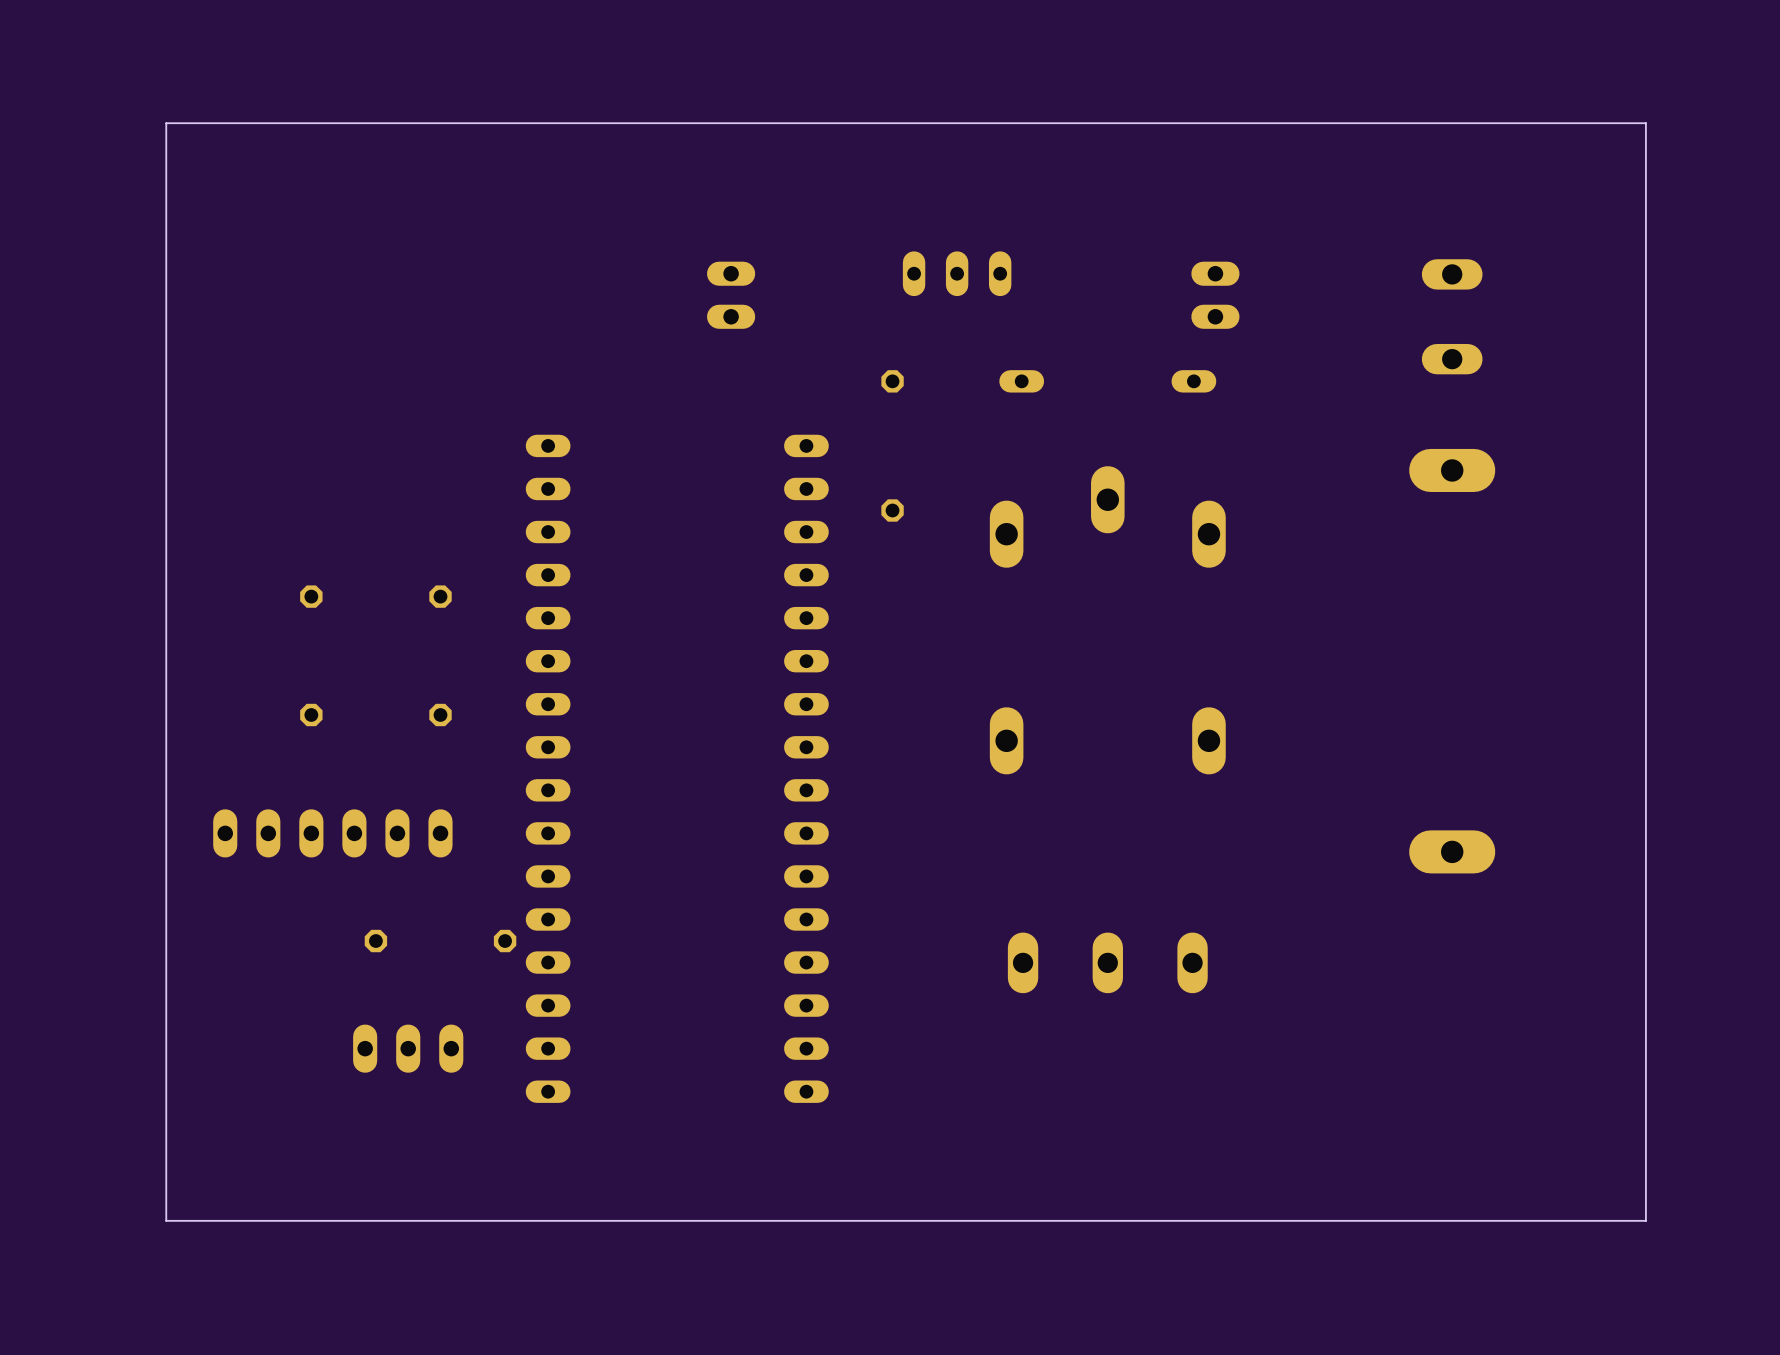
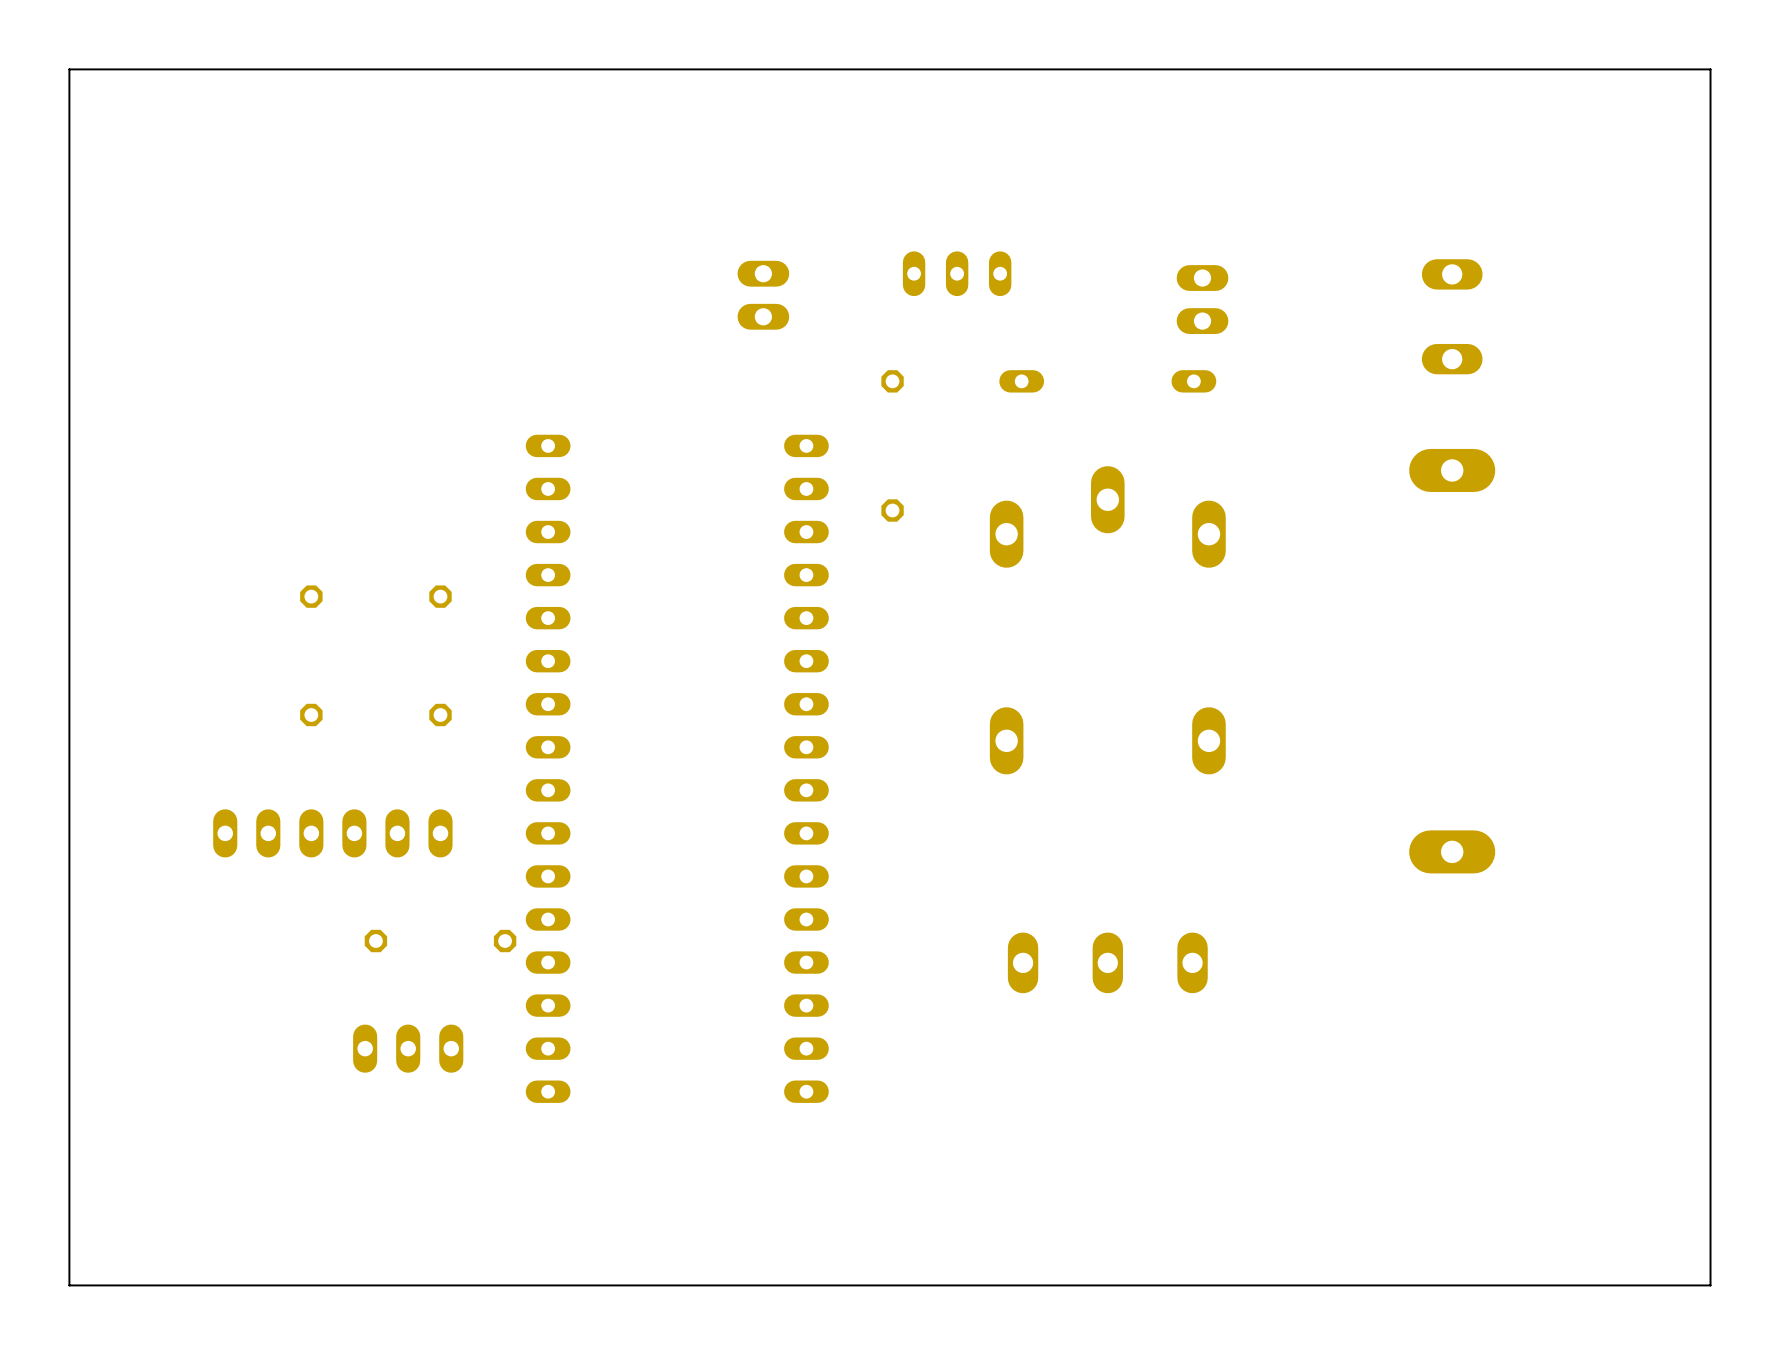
board edge: (1645, 123) (166, 123) (166, 1220) (1645, 1220) (1645, 123) -> (1710, 69) (1710, 1285) (69, 1285) (69, 69) (1710, 69)
part footprint: [1191, 261, 1240, 329] -> [1176, 265, 1229, 334]
part: (731, 295) -> none
part: none -> (763, 295)

